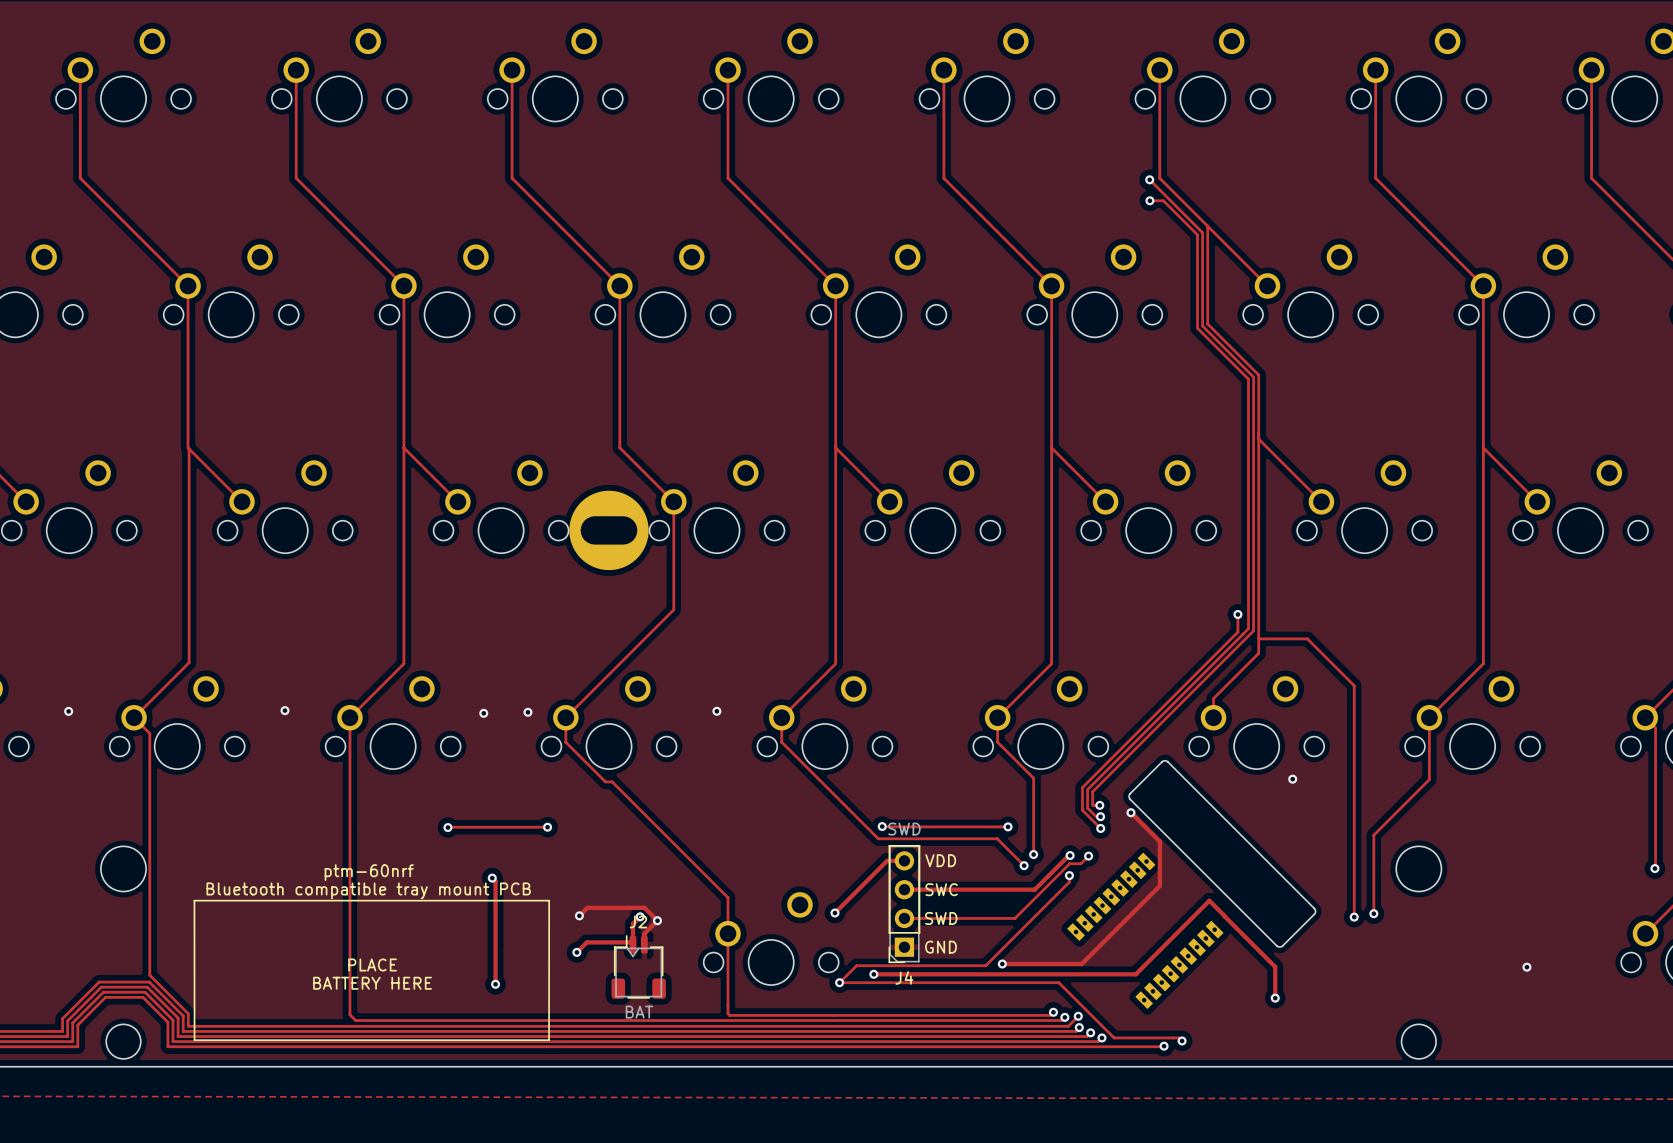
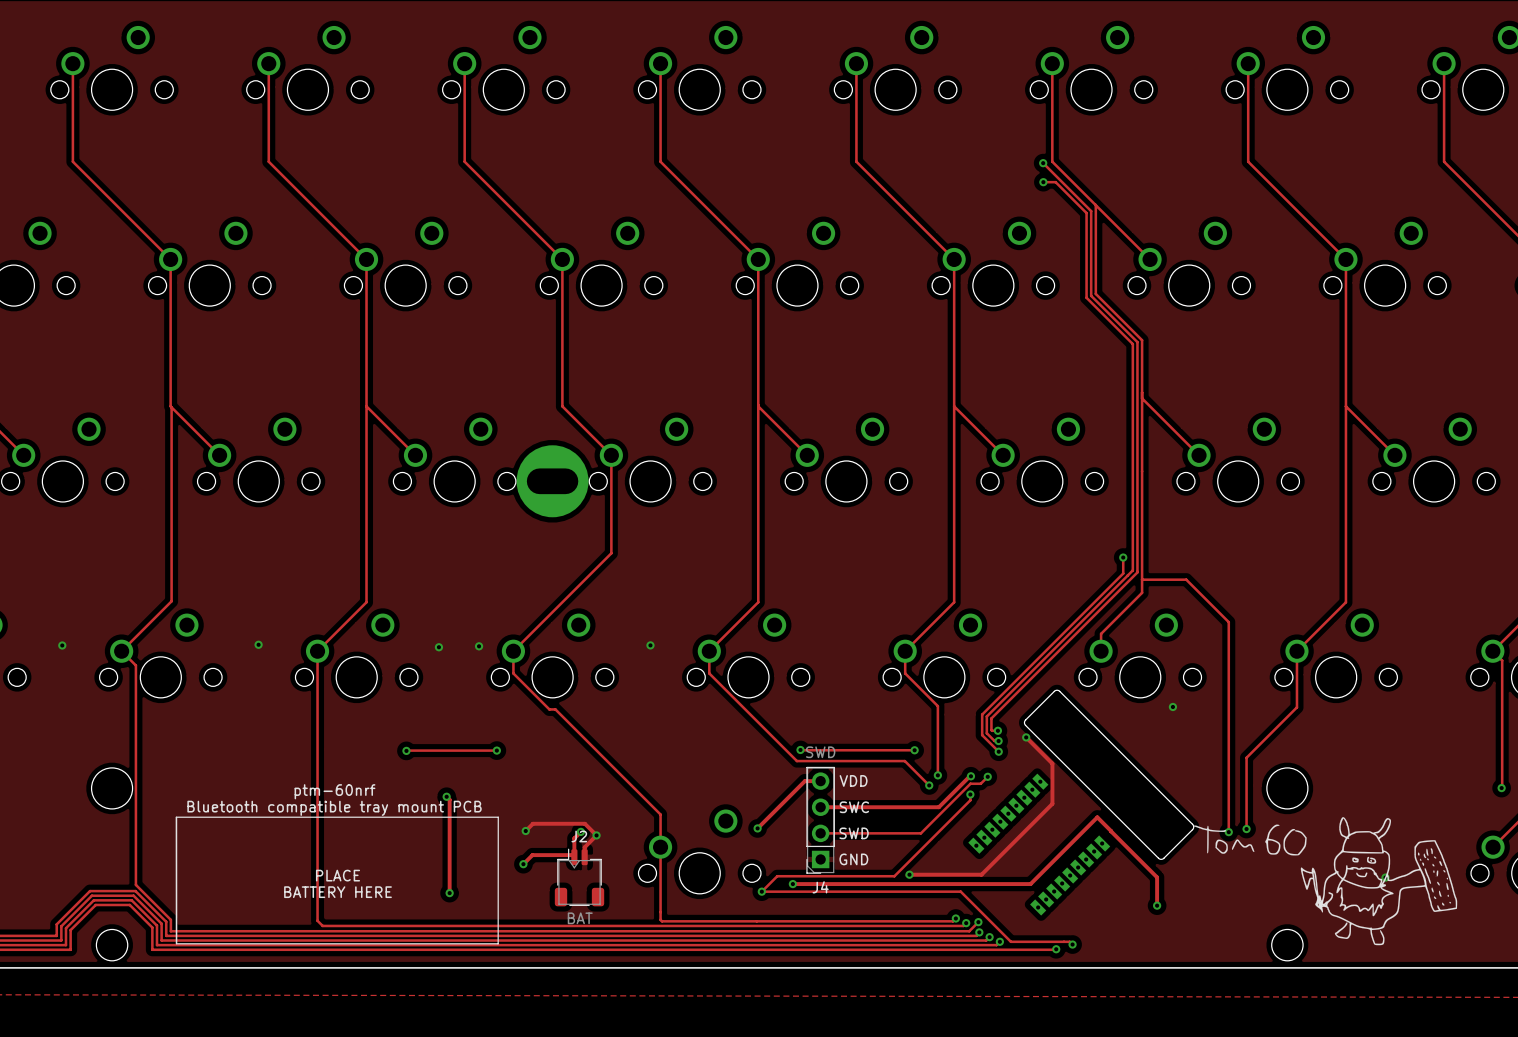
drawing: none -> [1193, 817, 1458, 946]

